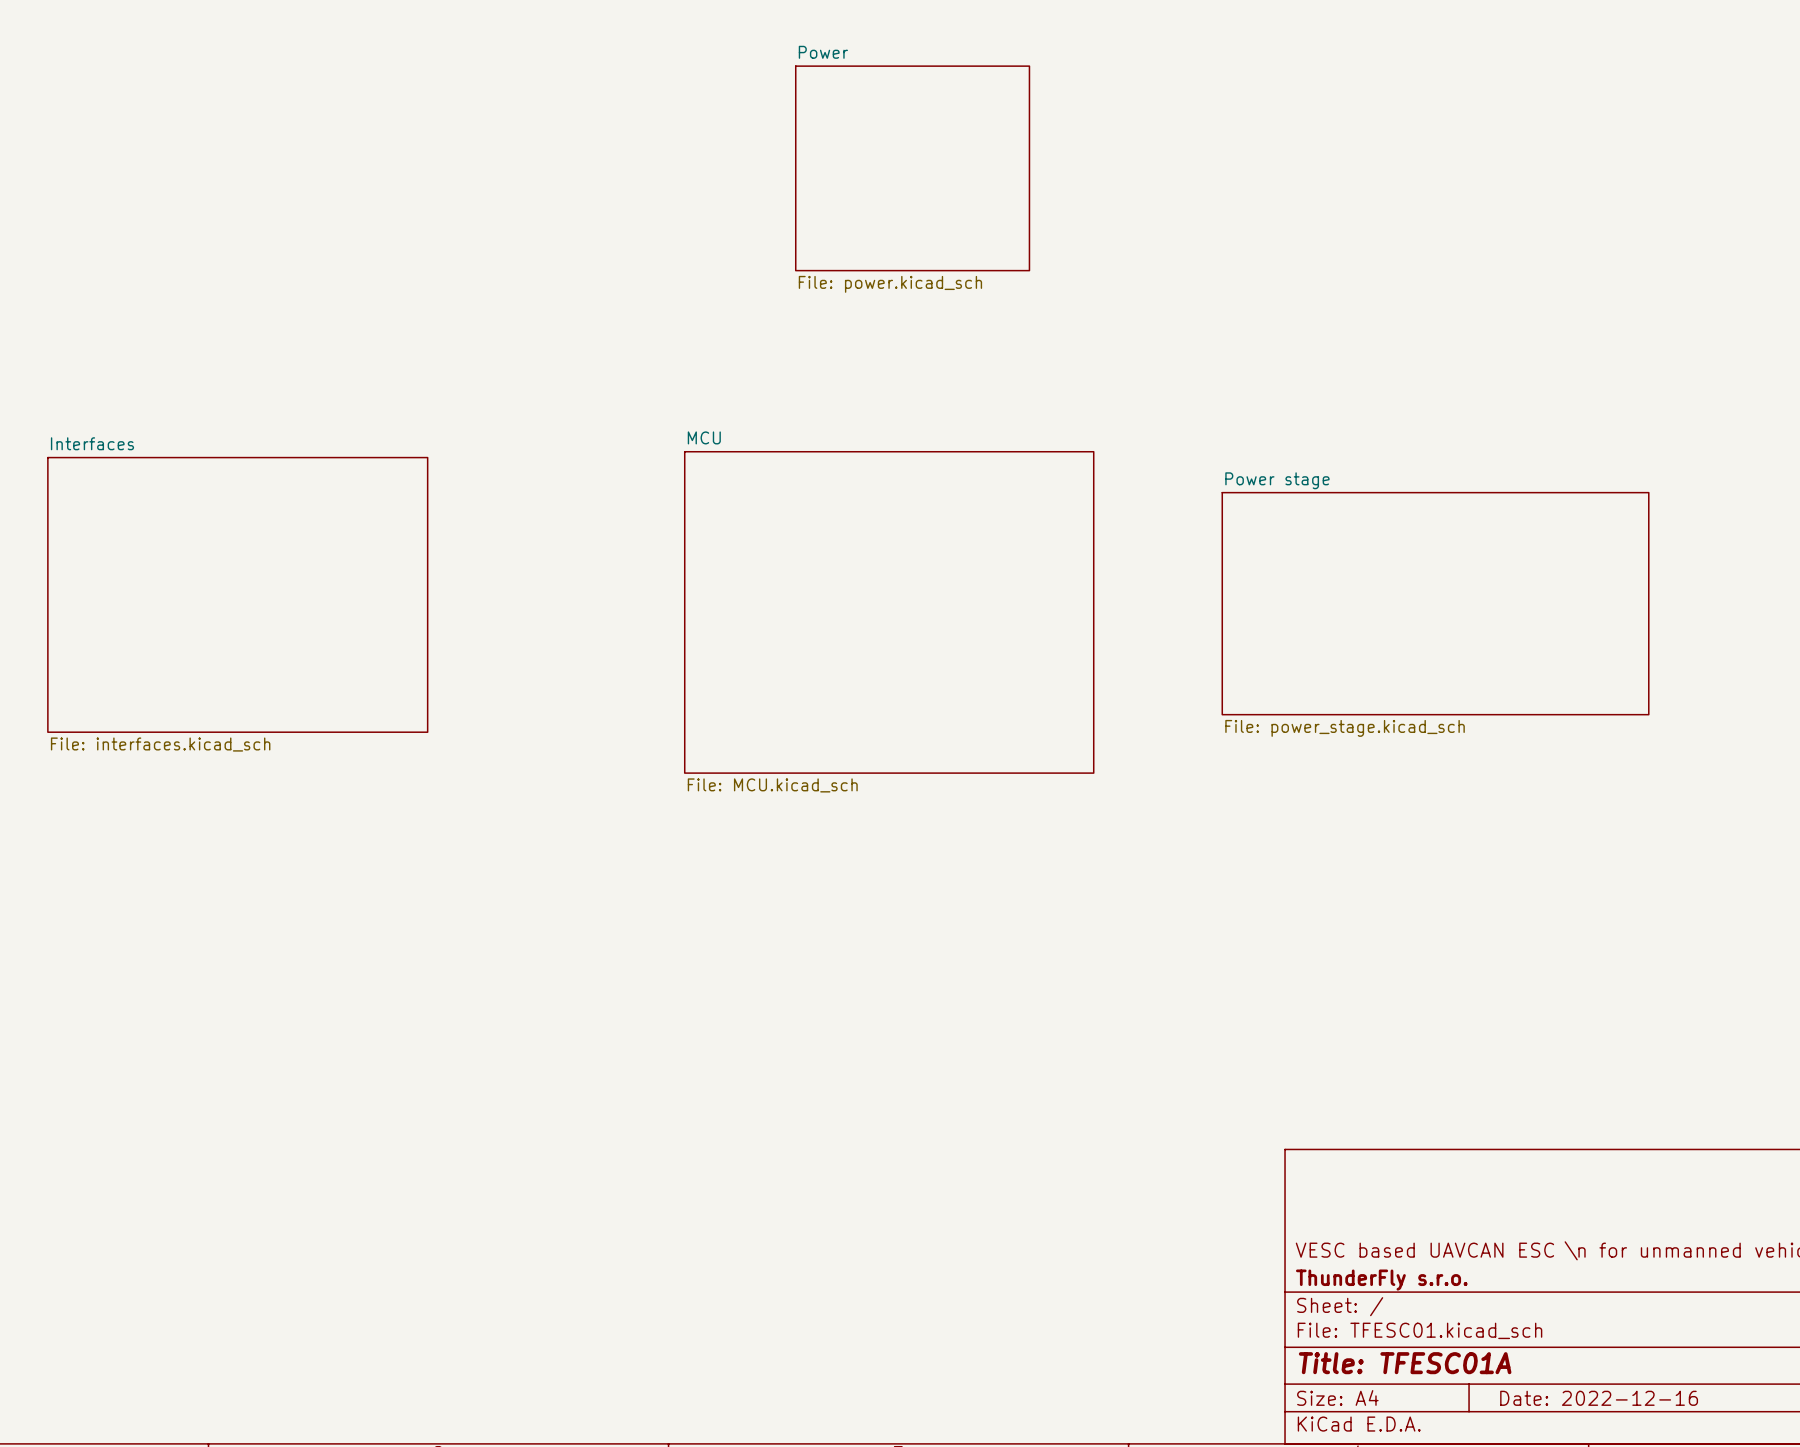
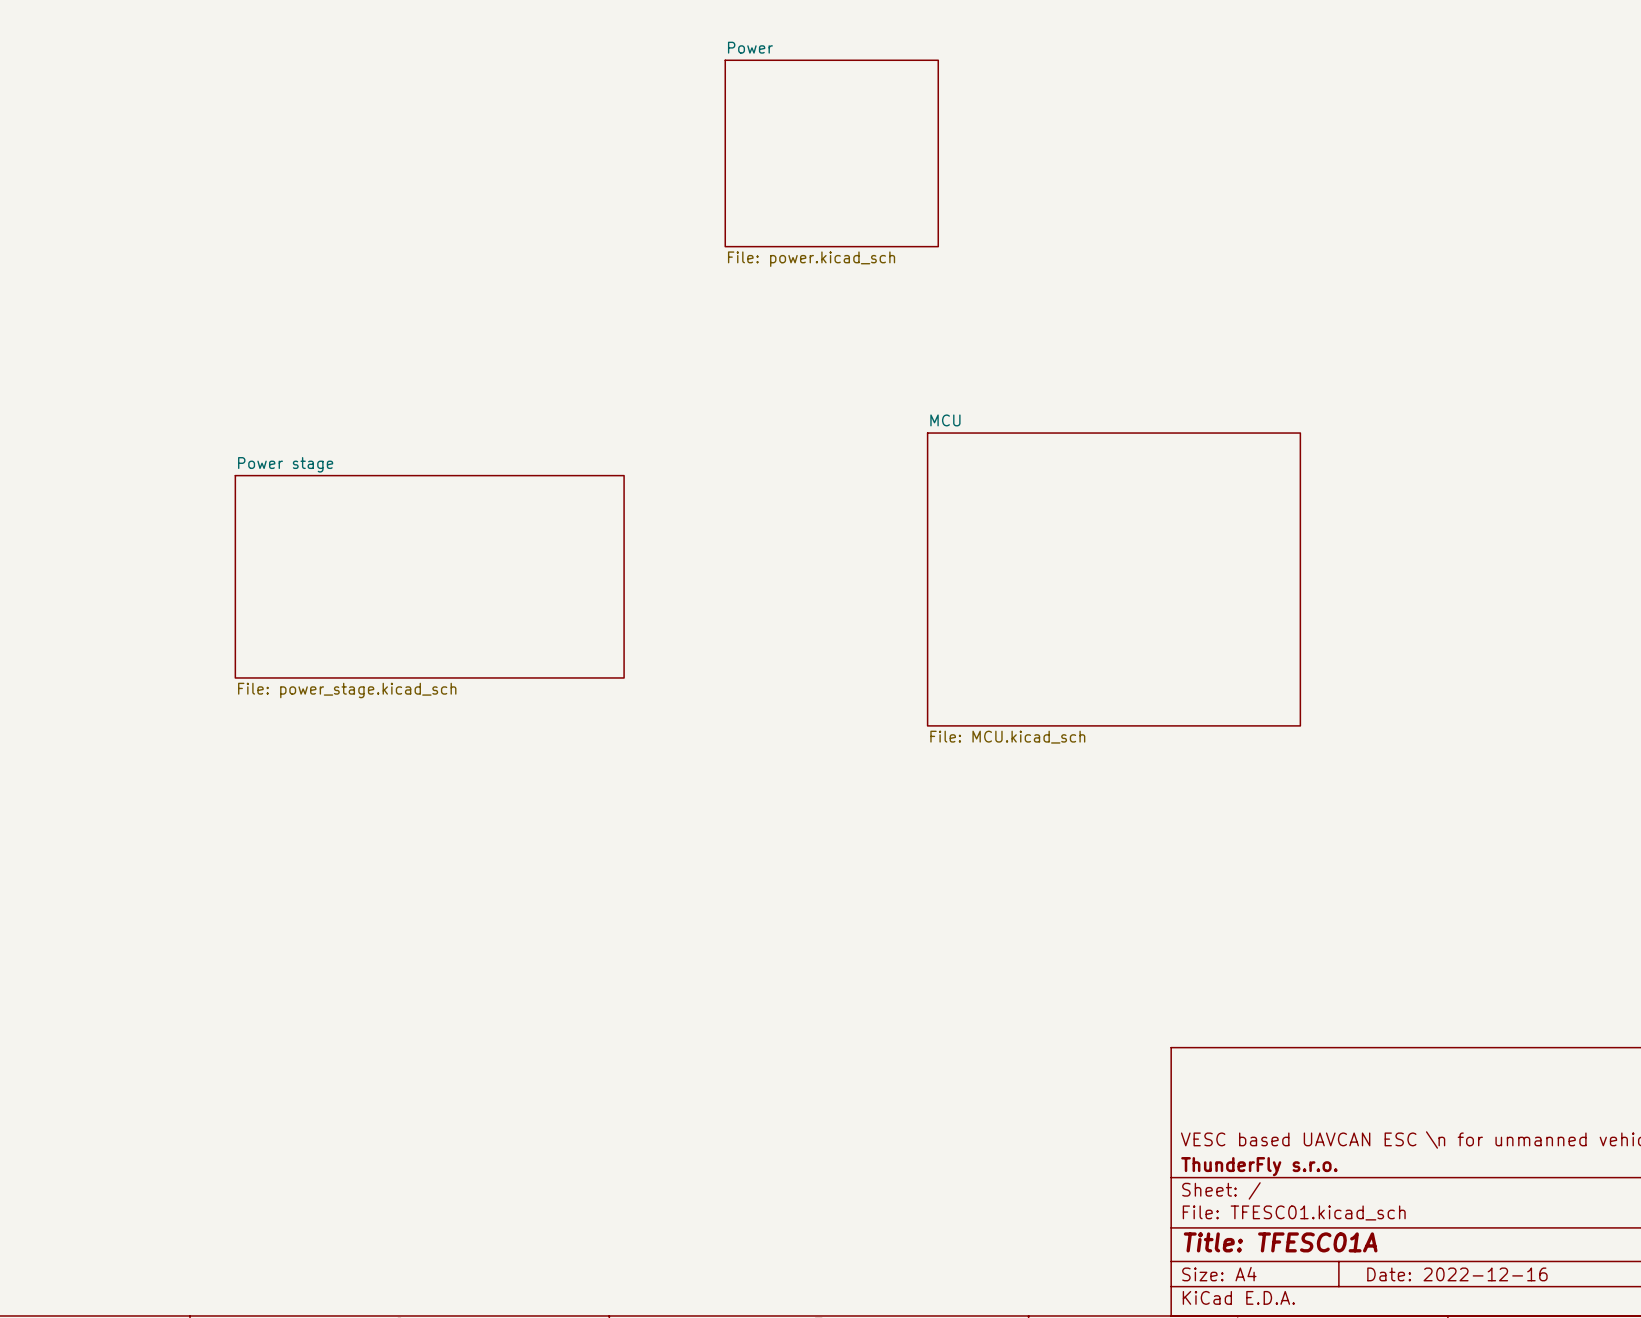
sheet Interfaces: File: interfaces.kicad_sch (237, 594) -> none
sheet Power stage: File: power_stage.kicad_sch (1435, 603) -> none
sheet MCU: File: MCU.kicad_sch (889, 612) -> none
sheet Power stage: none -> File: power_stage.kicad_sch (429, 576)
sheet MCU: none -> File: MCU.kicad_sch (1113, 579)

